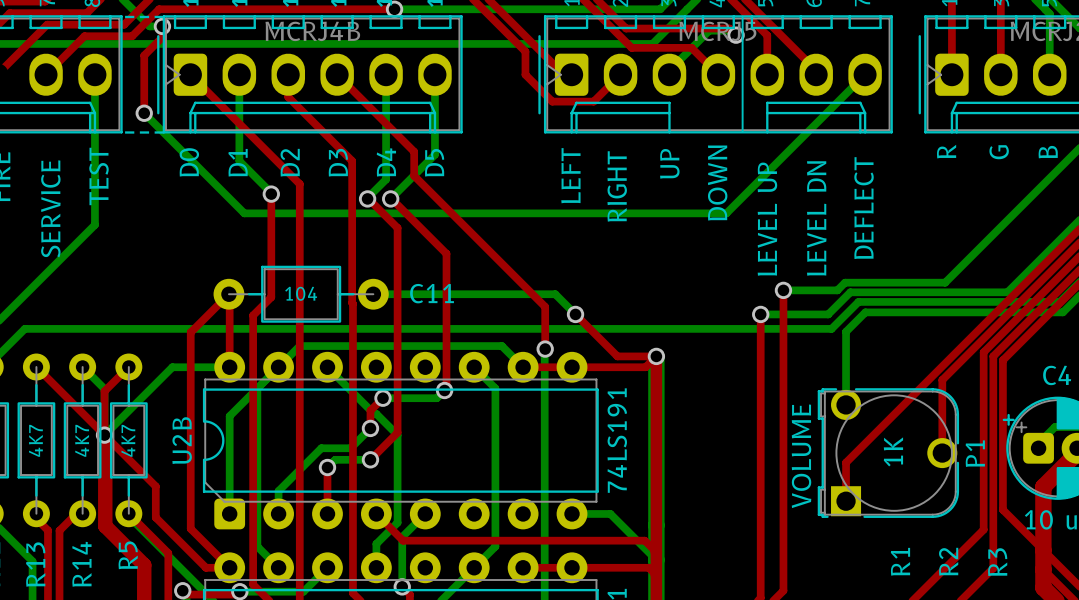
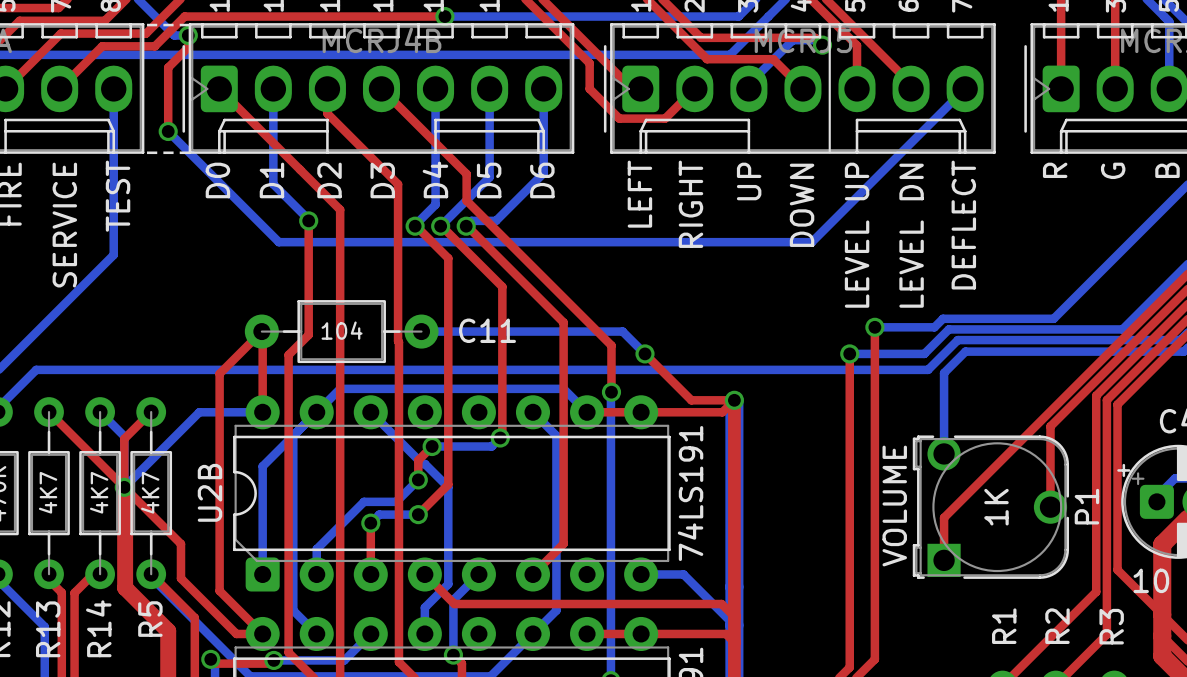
MCRJ4B footprint: [157, 15, 463, 134] -> [182, 23, 575, 154]
bottom track: none -> (543, 88) (543, 173) (496, 220) (471, 220) (466, 226)
text: none -> D6 (542, 180)
top track: none -> (466, 226) (563, 322) (563, 543) (532, 574)
via: none -> (466, 226)

